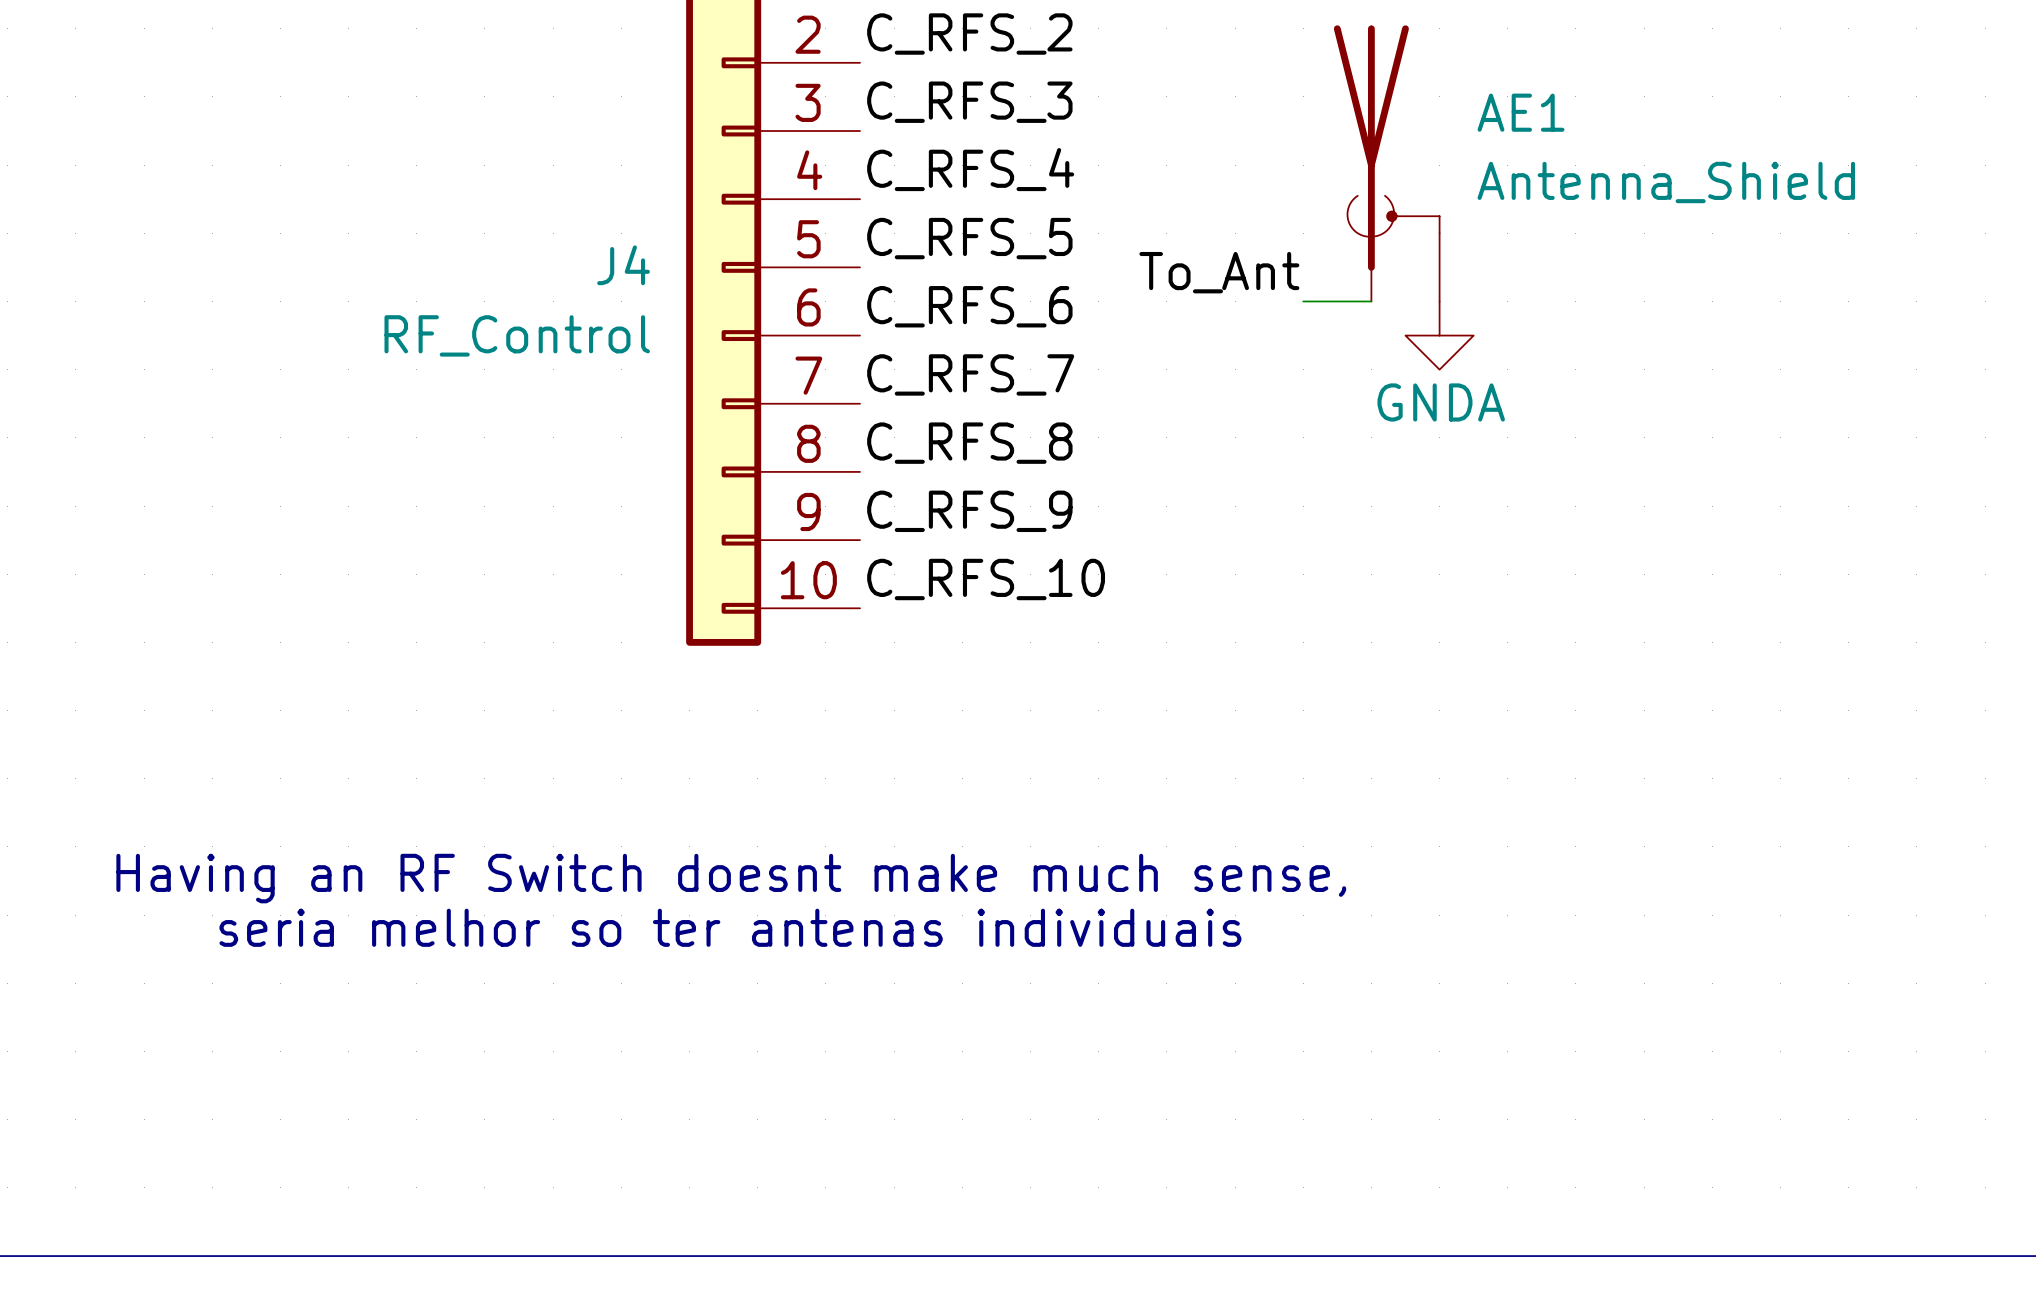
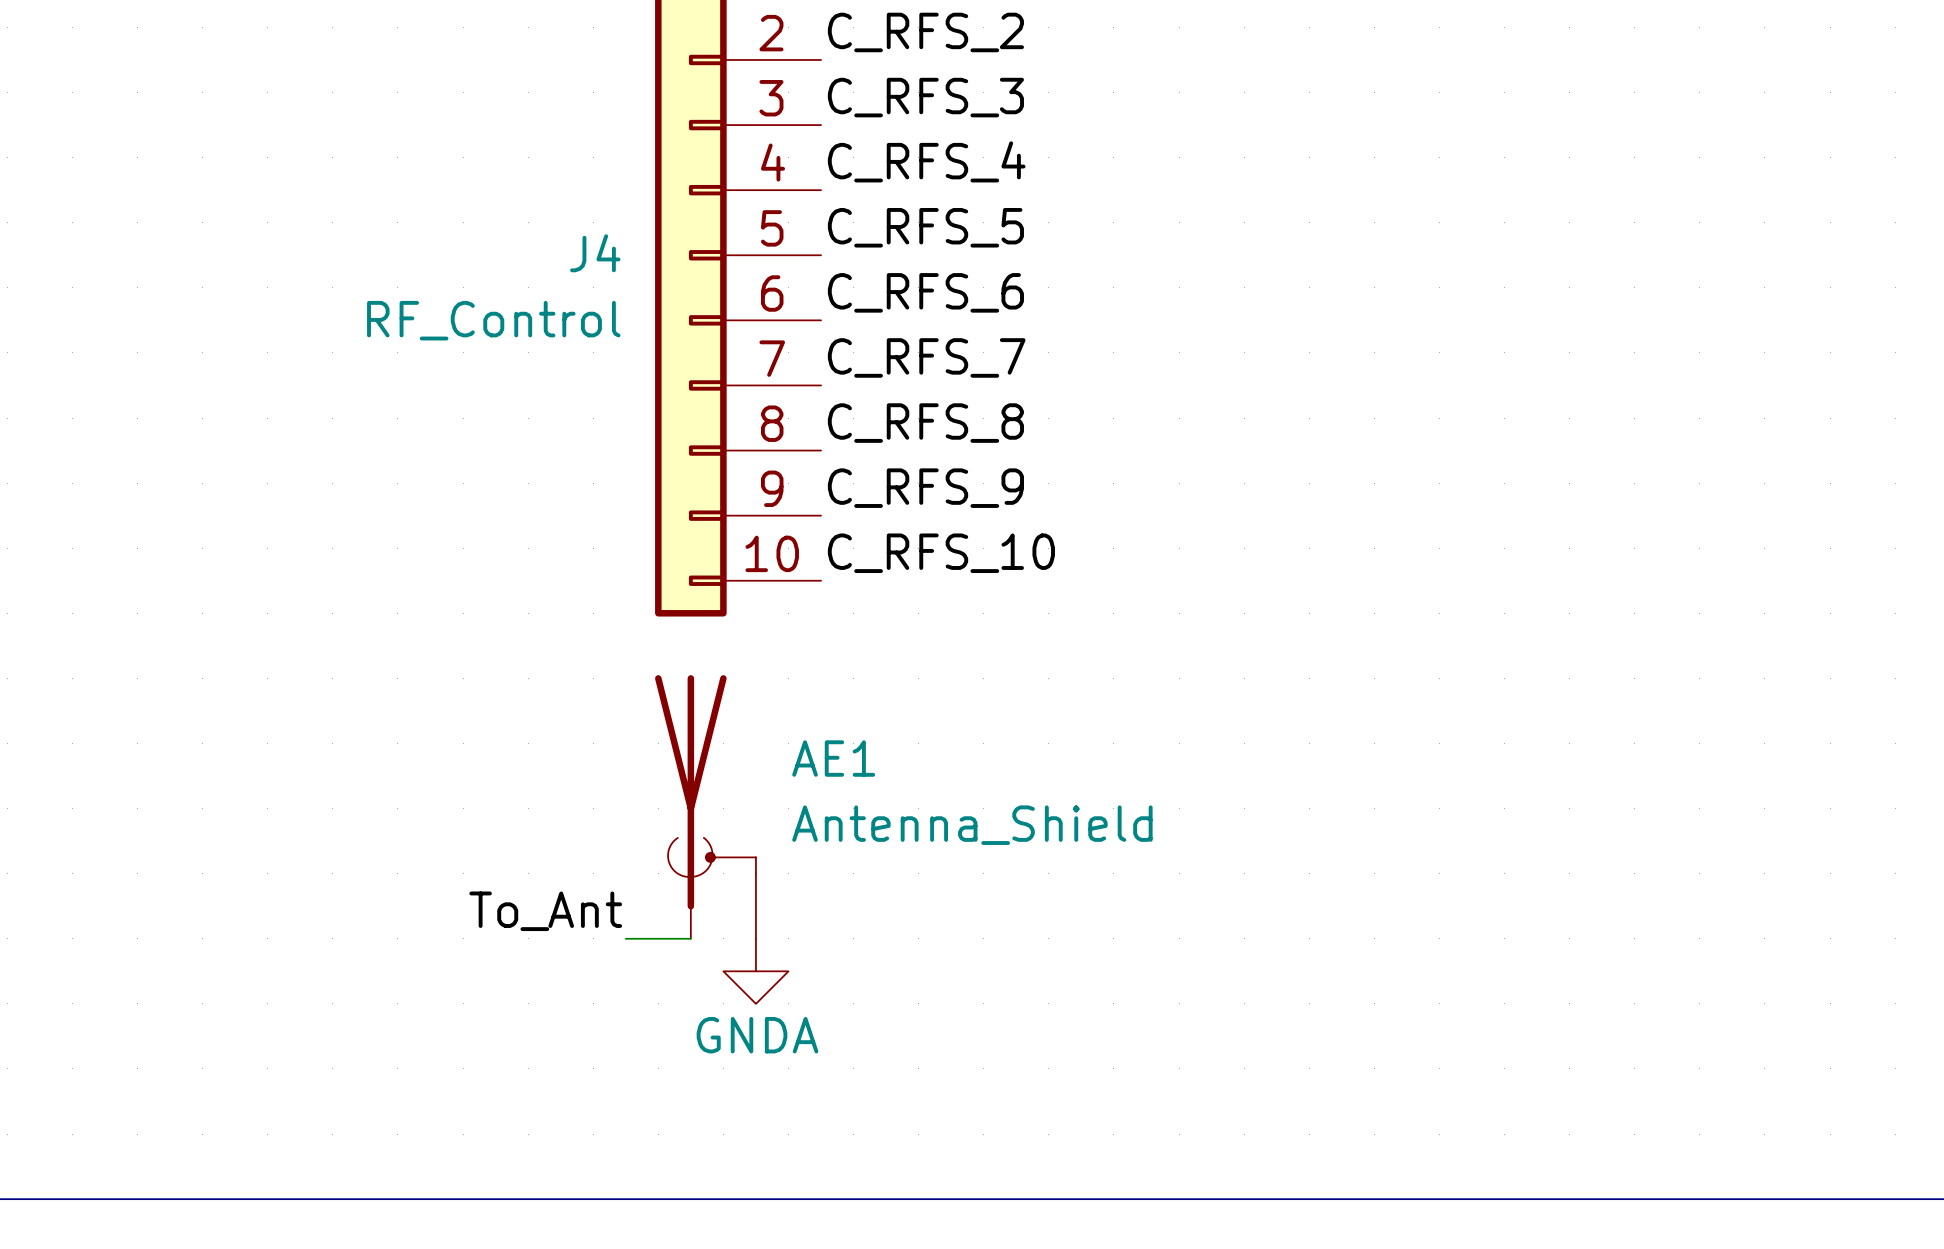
AE1 position: (1386, 163) -> (705, 806)
label: To_Ant (1219, 272) -> none
wire: (1303, 301) (1371, 301) -> none
power symbol: GNDA (1439, 335) -> none
text: Having an RF Switch doesnt make much sense, (731, 878) -> none
text: seria melhor so ter antenas individuais (730, 927) -> none
label: none -> To_Ant (545, 911)
wire: none -> (625, 938) (690, 938)
power symbol: none -> GNDA (755, 971)

